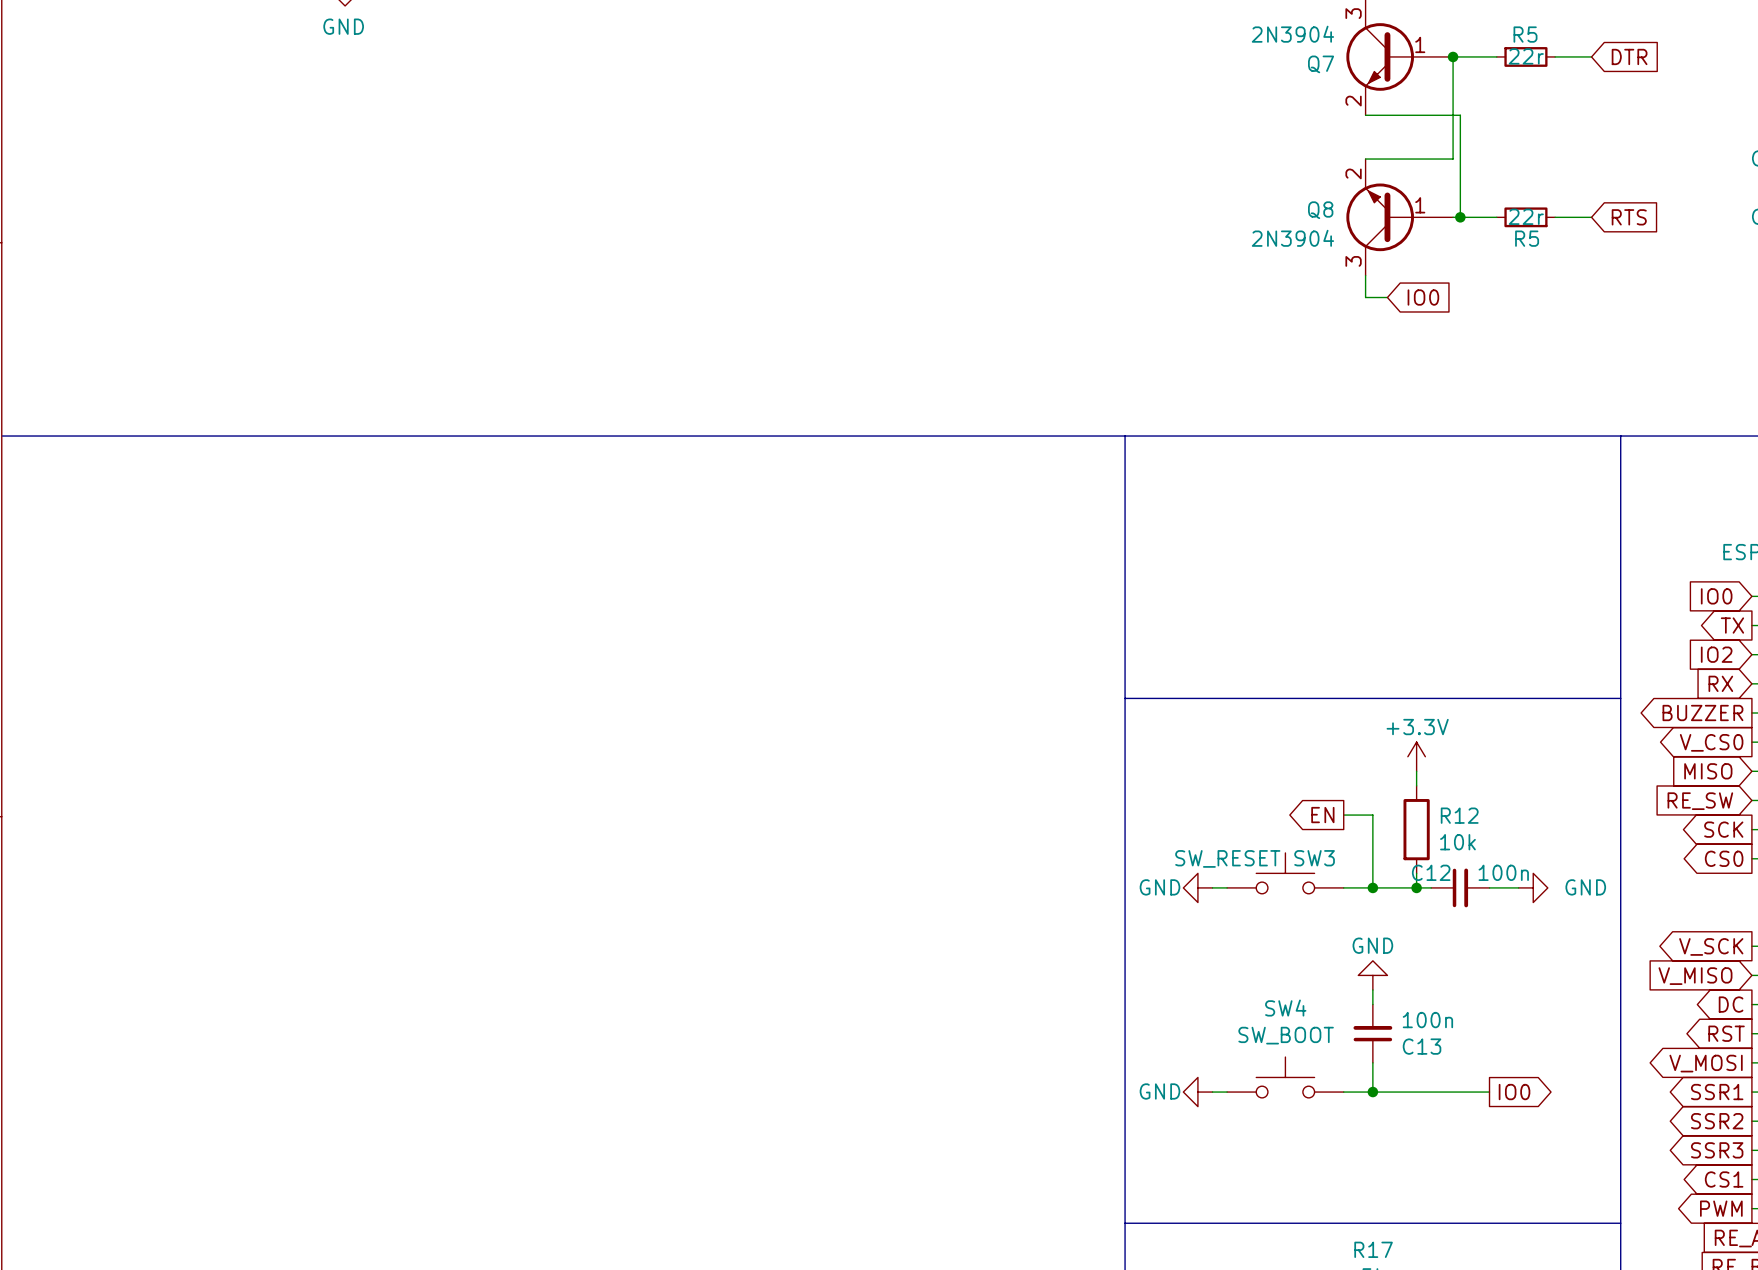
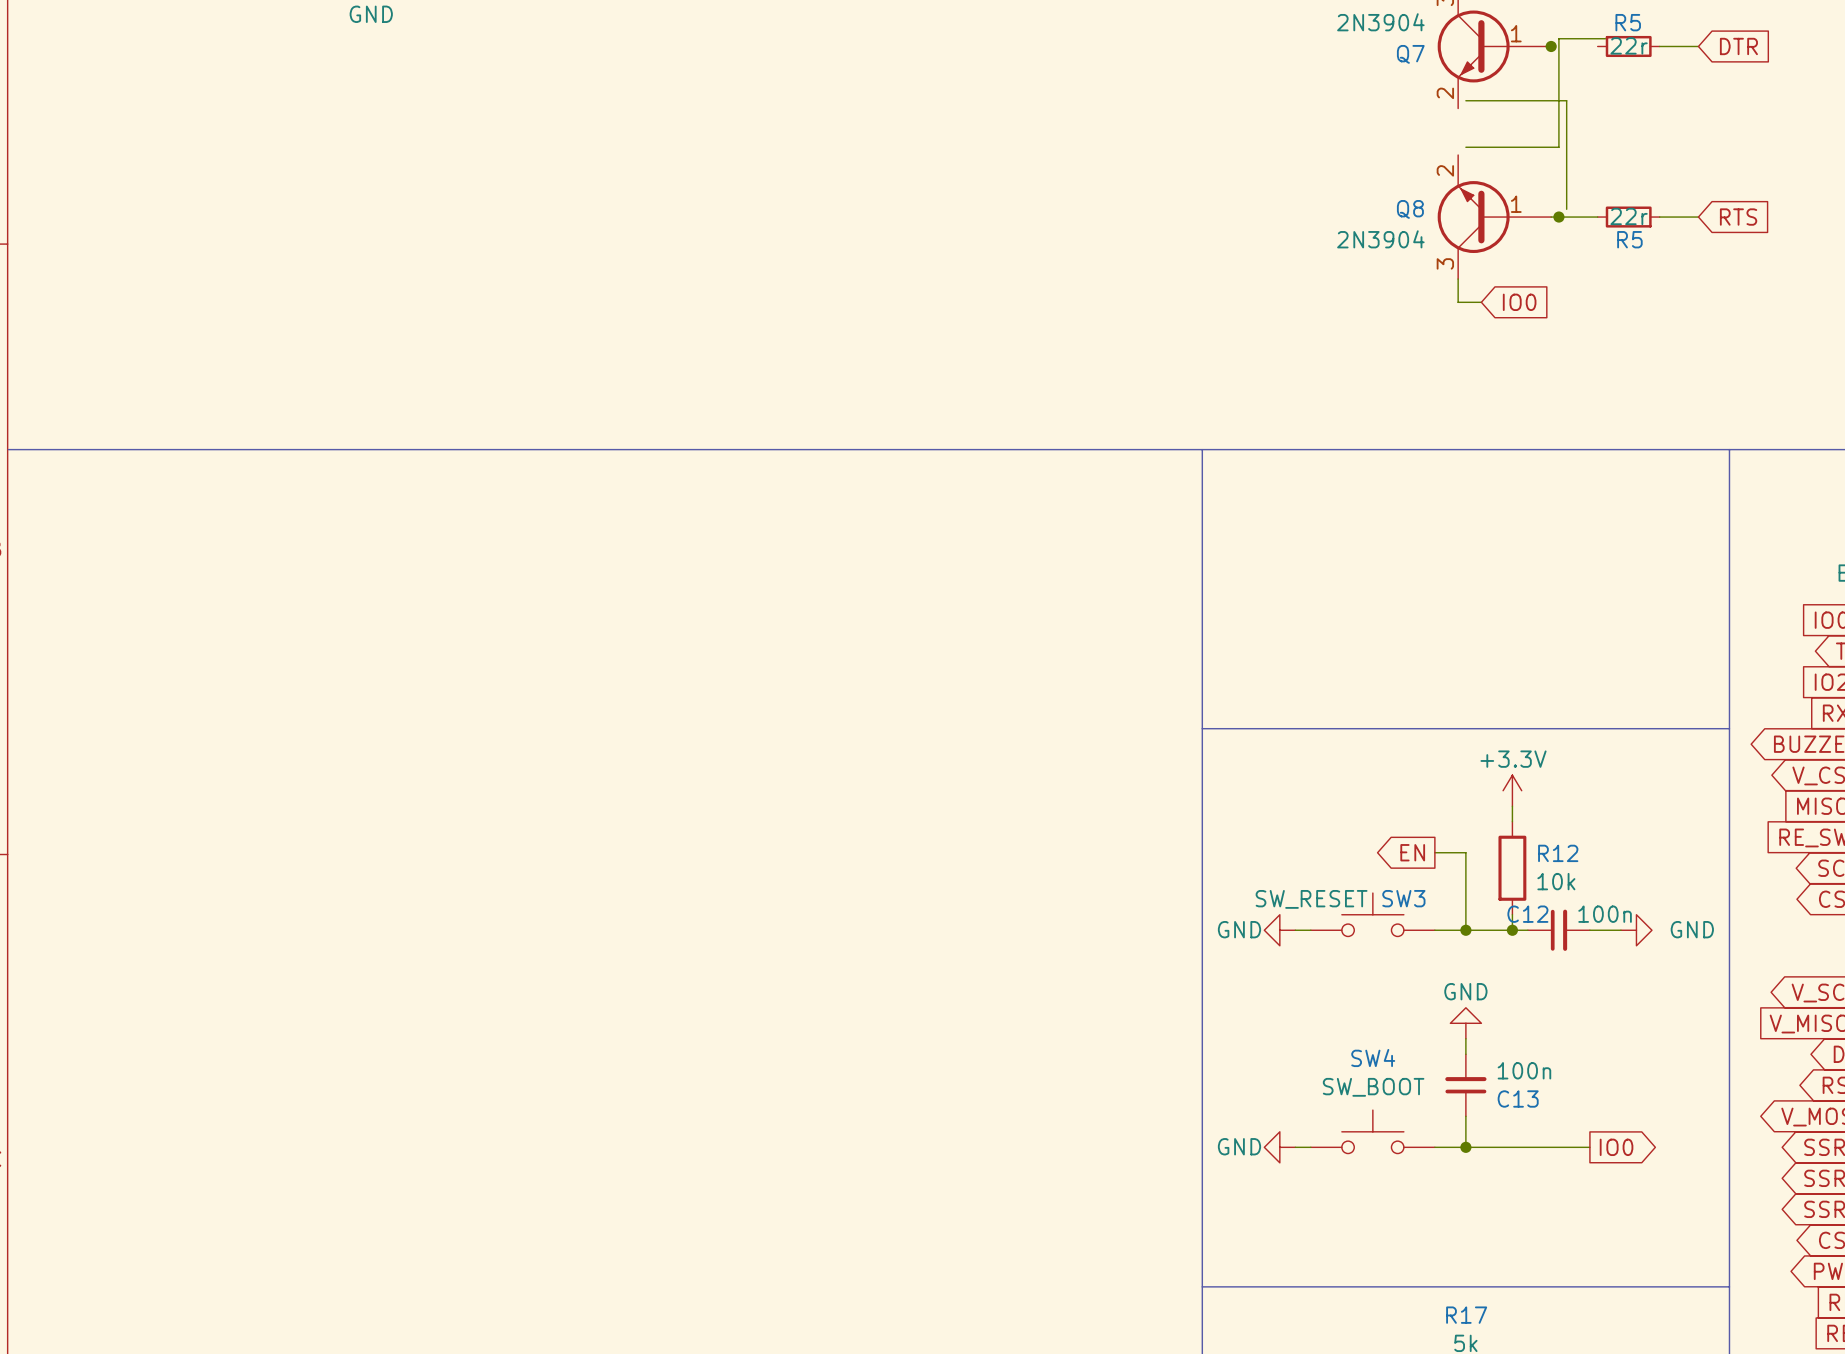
wire: (1496, 56) (1453, 56) (1453, 159) (1365, 159) -> none
wire: none -> (1465, 100) (1566, 100) (1566, 209)
wire: (1365, 115) (1460, 115) -> (1605, 38) (1558, 38) (1558, 108)
wire: (1460, 151) (1460, 217) -> (1558, 147) (1465, 147)

